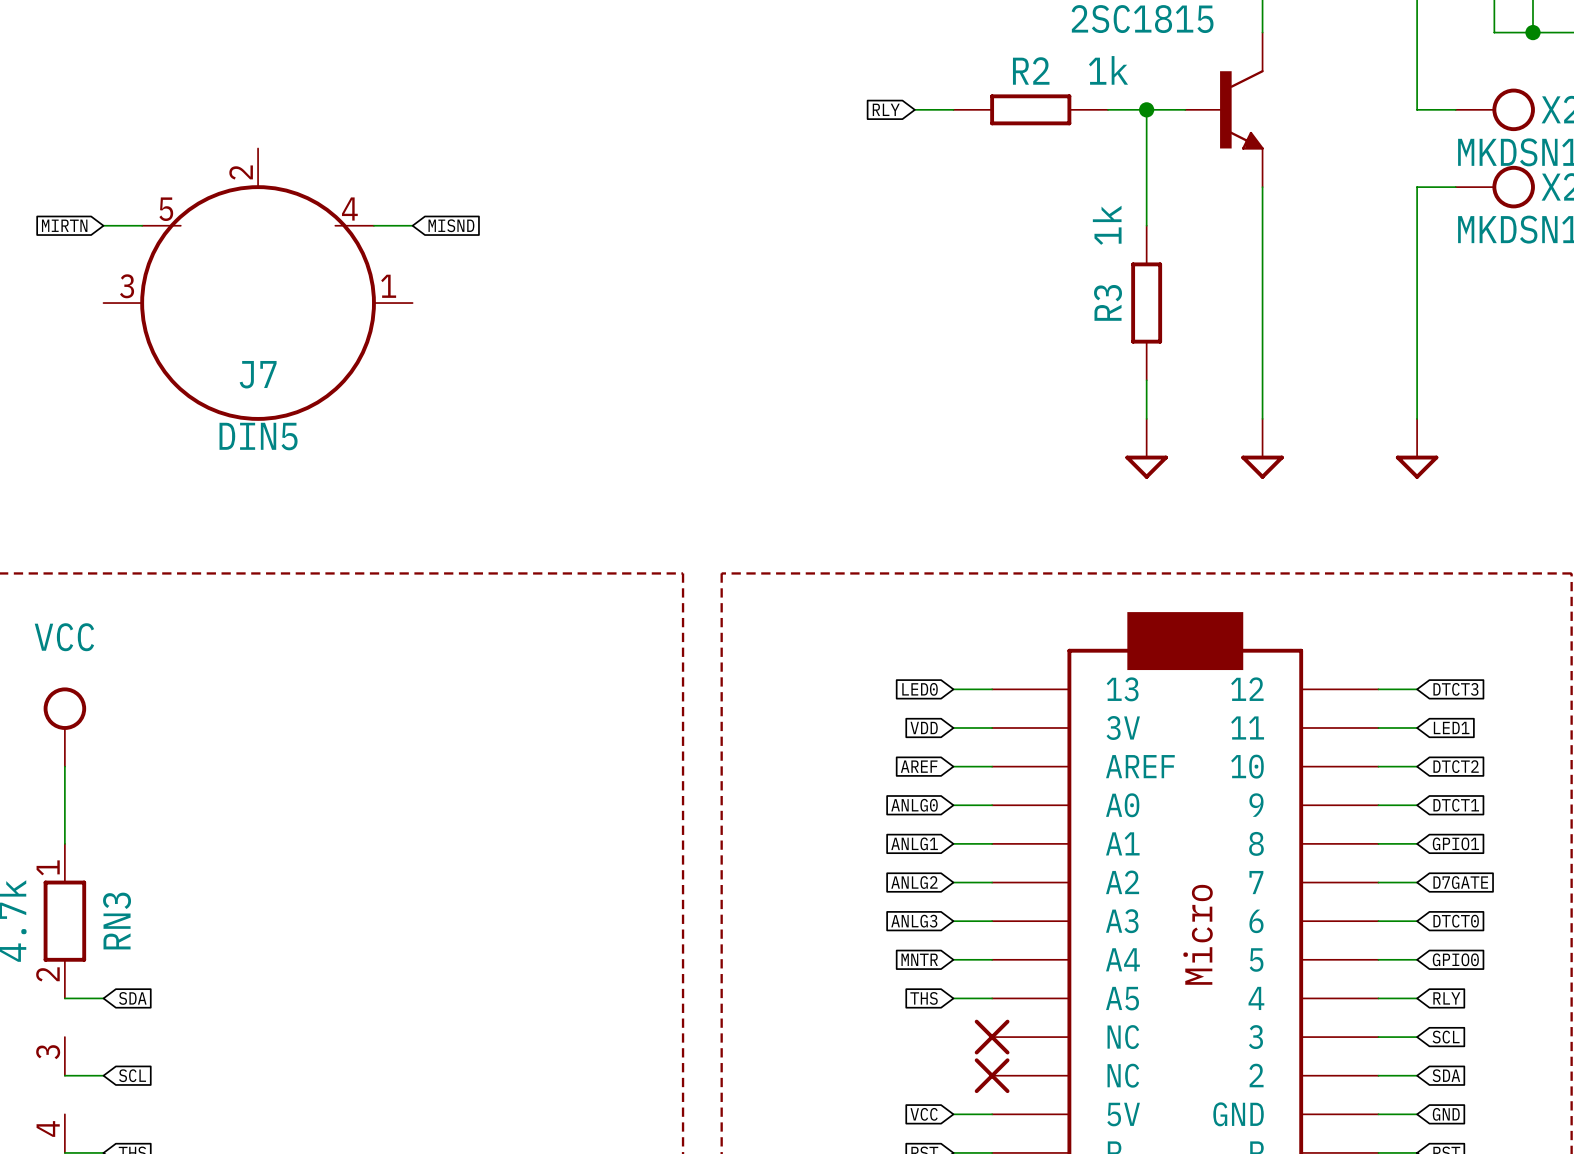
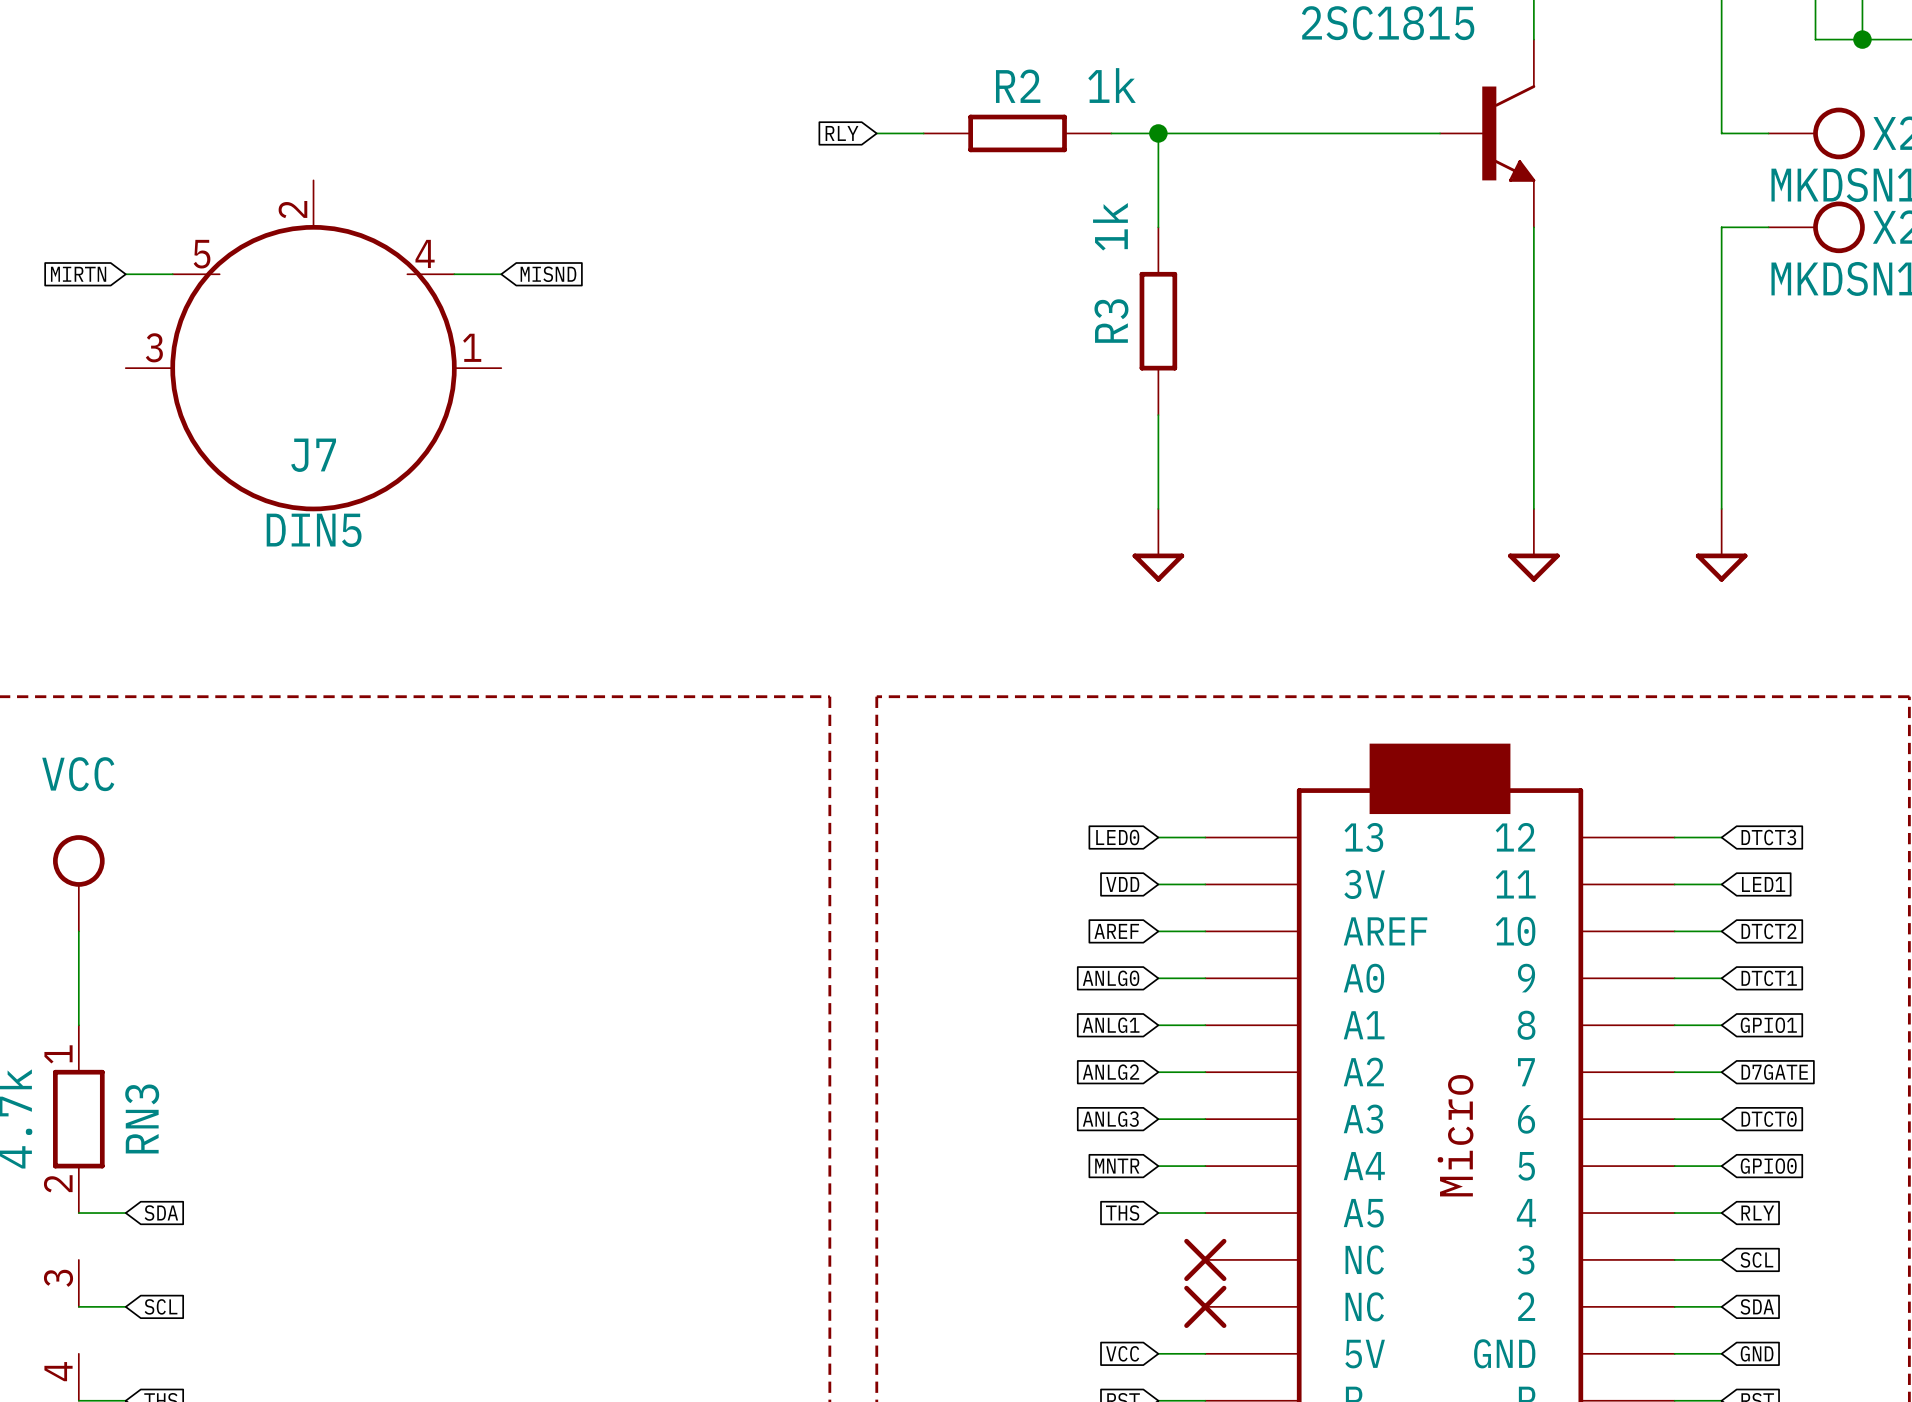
wire: none -> (876, 133) (923, 133)
global label position: RLY (886, 109) -> RLY (842, 133)
junction: none -> (1158, 133)
R2 position: (1030, 109) -> (1017, 133)
wire: none -> (1346, 133) (1158, 133) (1158, 227)
wire: (1146, 109) (1146, 225) -> none
junction: (1146, 109) -> none
R3 position: (1146, 303) -> (1158, 321)
wire: none -> (1158, 415) (1158, 508)
wire: (1146, 380) (1146, 418) -> none
power symbol position: (1146, 448) -> (1158, 545)

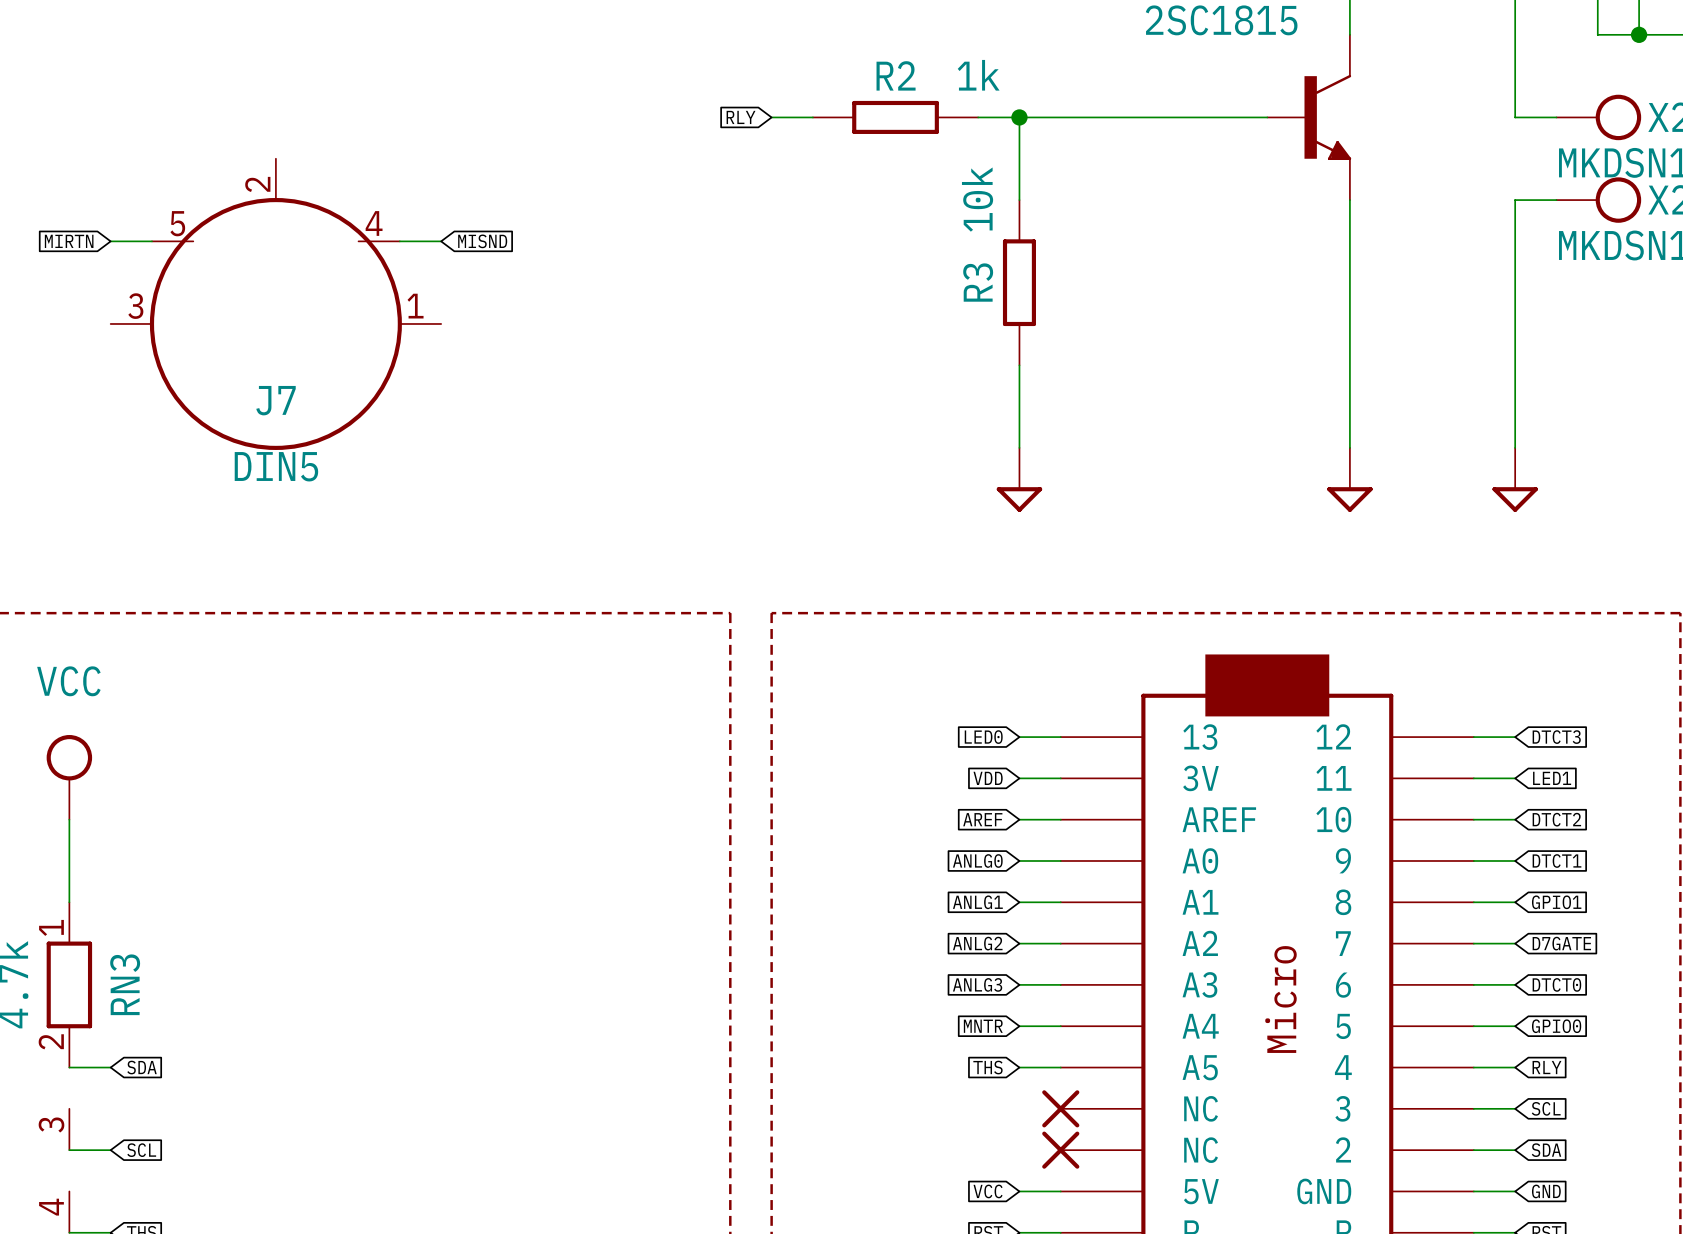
R3 value: 1k (1110, 226) -> 10k (977, 199)

